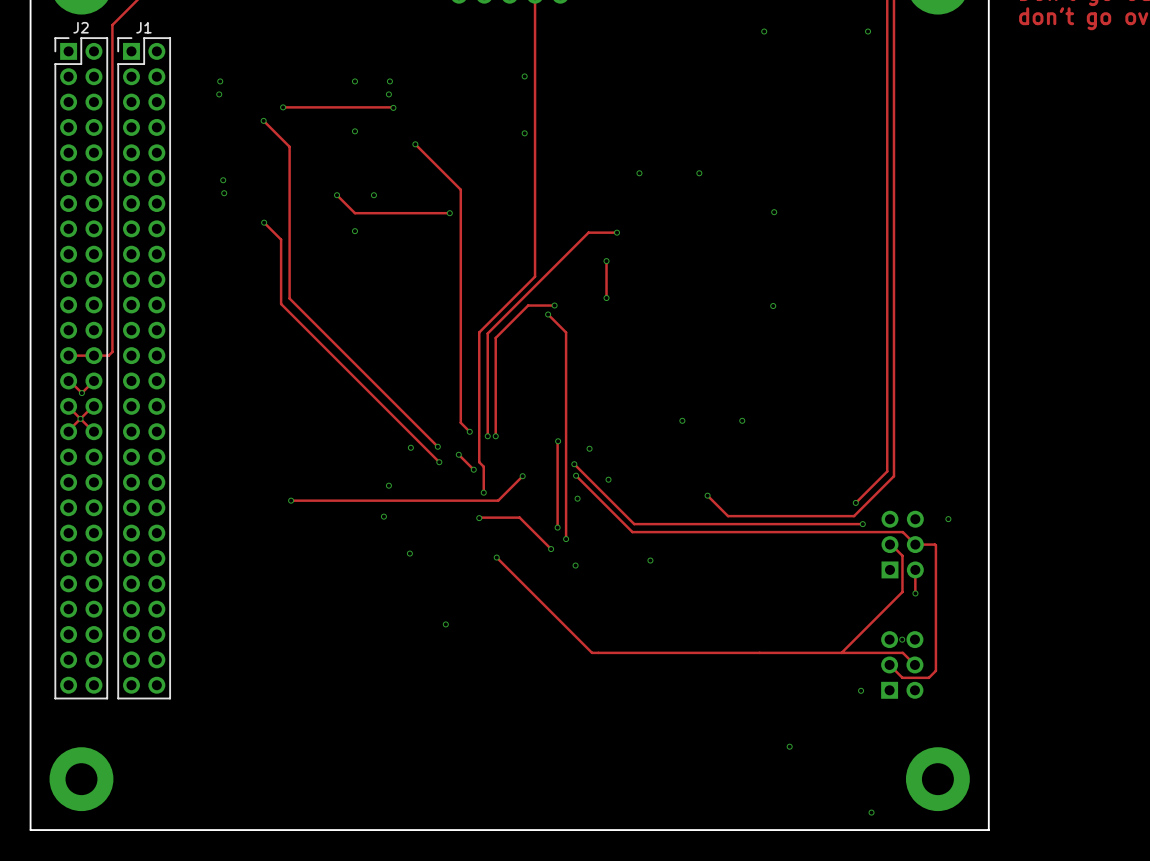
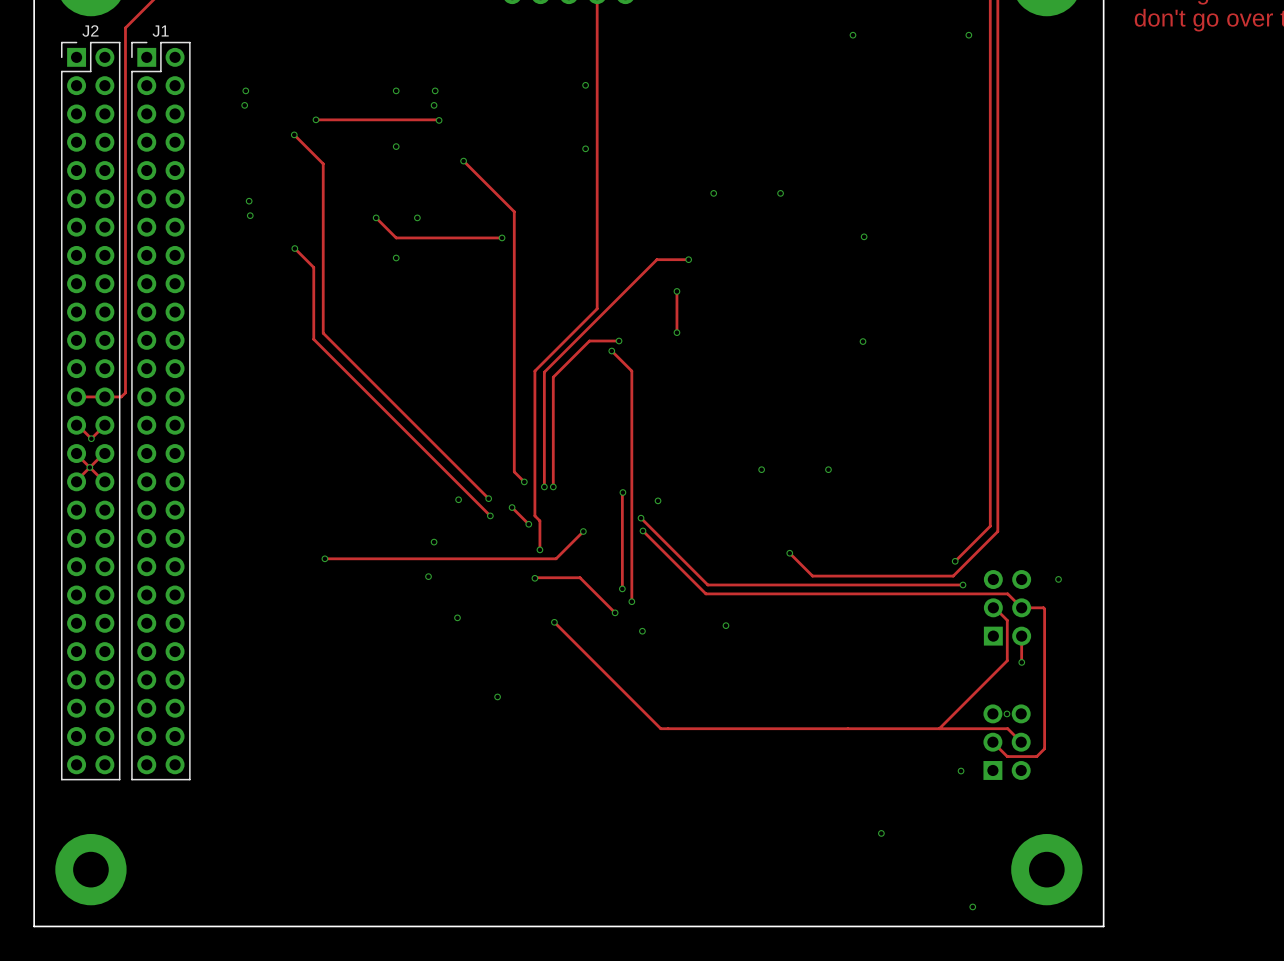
via: (608, 479) -> none
via: (577, 498) -> none

